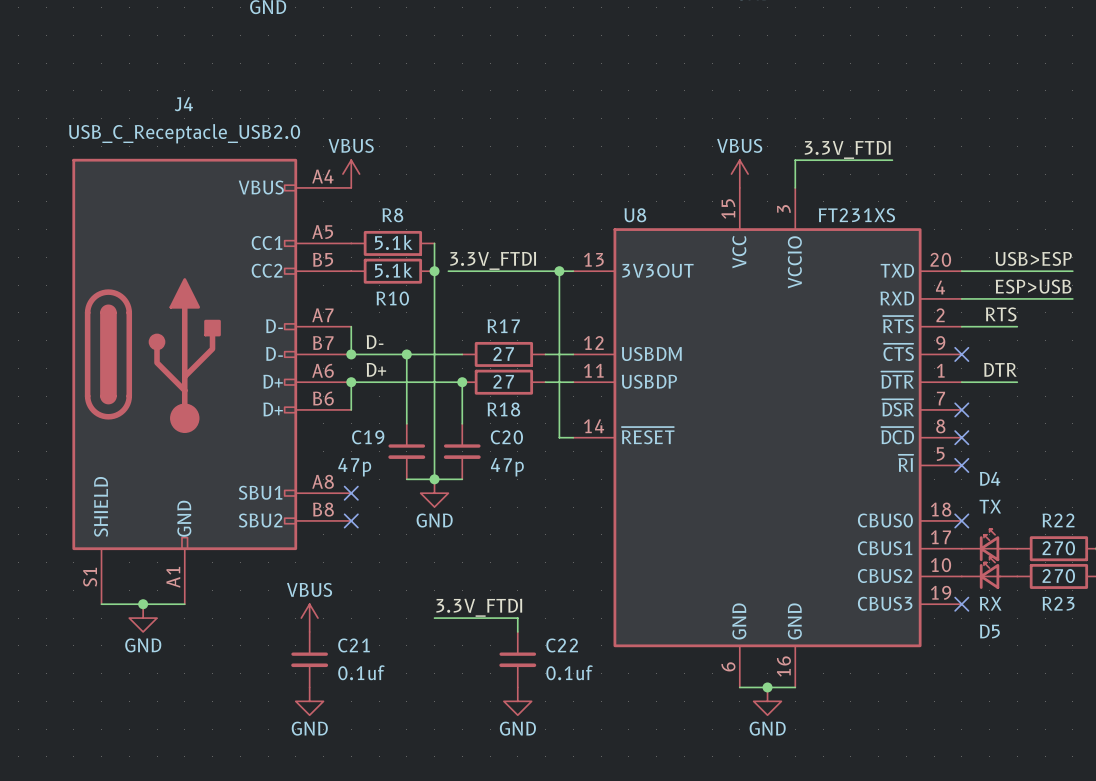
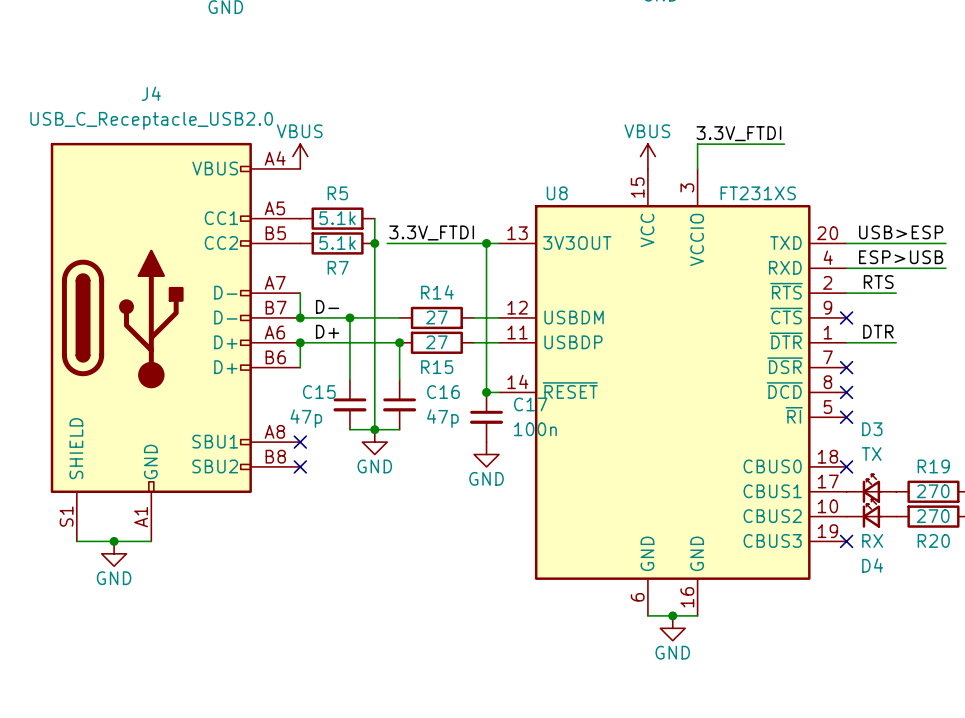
R8 name: R8 (392, 215) -> R5 (337, 193)
R10 name: R10 (392, 298) -> R7 (338, 267)
R17 name: R17 (503, 326) -> R14 (437, 292)
R18 name: R18 (503, 409) -> R15 (437, 367)
C19 name: C19 (368, 437) -> C15 (319, 392)
C20 name: C20 (506, 437) -> C16 (443, 392)
junction: none -> (486, 392)
C17: none -> 100n (486, 417)
D4 name: D4 (990, 478) -> D3 (872, 429)
power symbol: none -> GND (486, 454)
R22 name: R22 (1058, 520) -> R19 (933, 466)
R23 name: R23 (1058, 603) -> R20 (933, 540)
label: 3.3V_FTDI (479, 607) -> none
power symbol: VBUS (309, 618) -> none
wire: (434, 618) (517, 618) (517, 631) -> none
D5 name: D5 (989, 631) -> D4 (872, 565)
C21: 0.1uf (309, 659) -> none
C22: 0.1uf (517, 659) -> none
power symbol: GND (309, 701) -> none
power symbol: GND (517, 701) -> none

